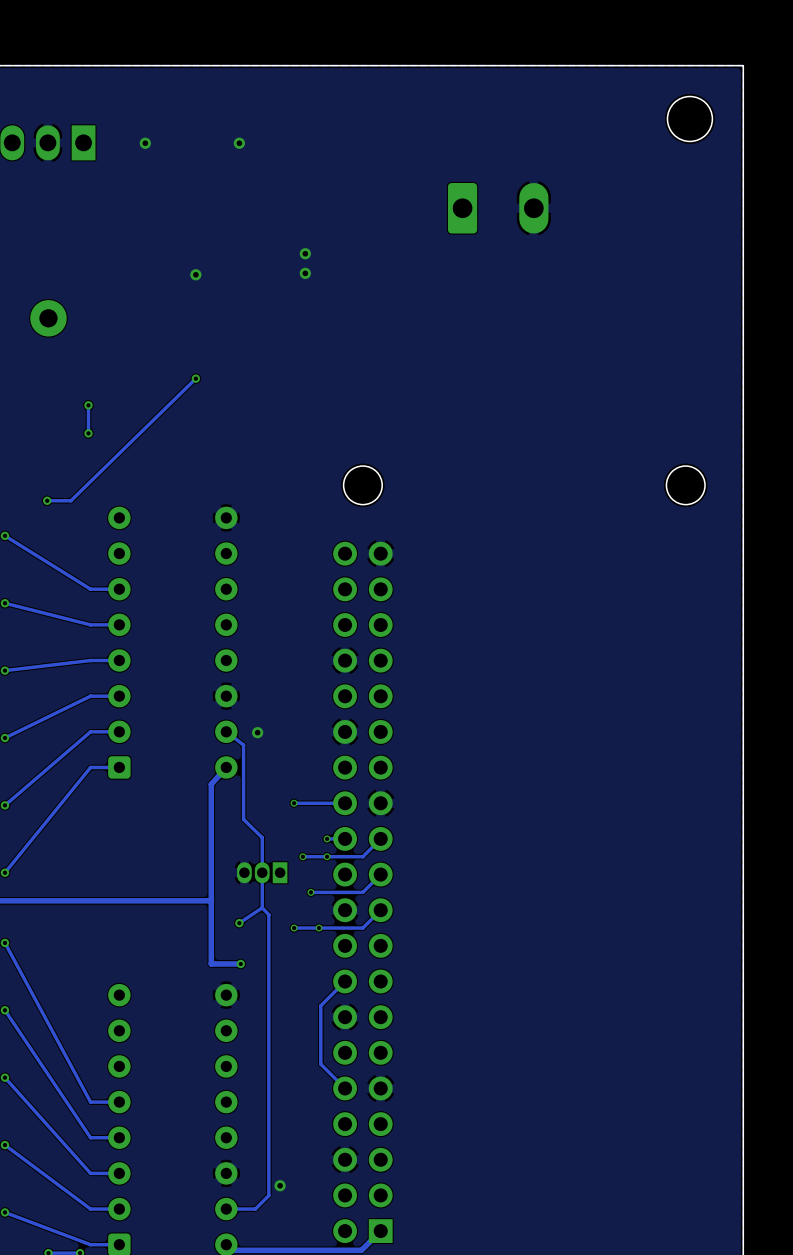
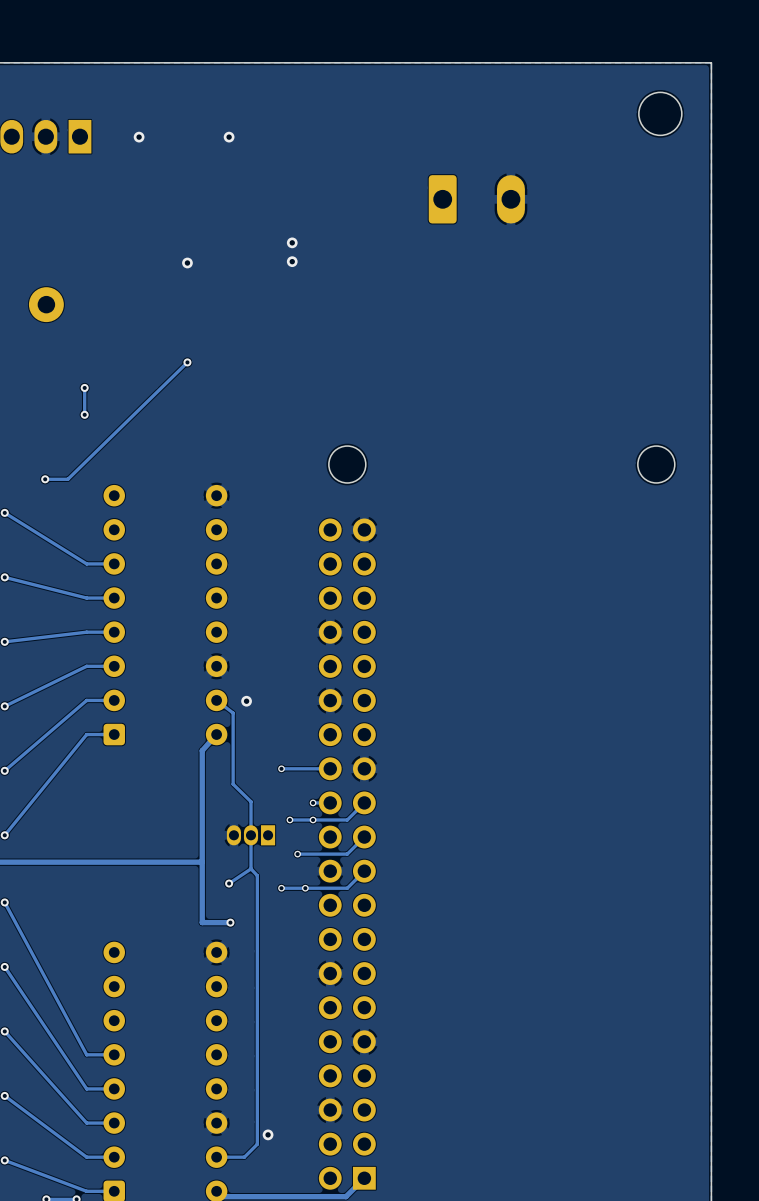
track: (345, 981) (320, 1005) (320, 1064) (345, 1088) -> none

